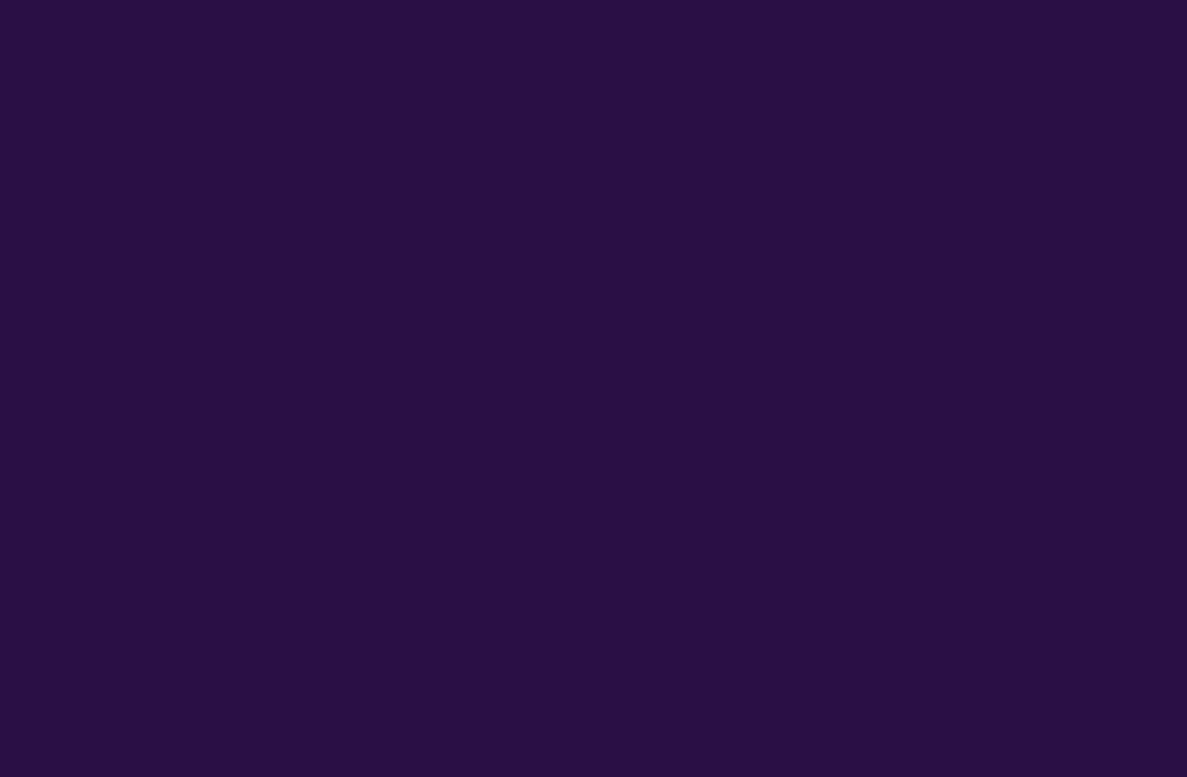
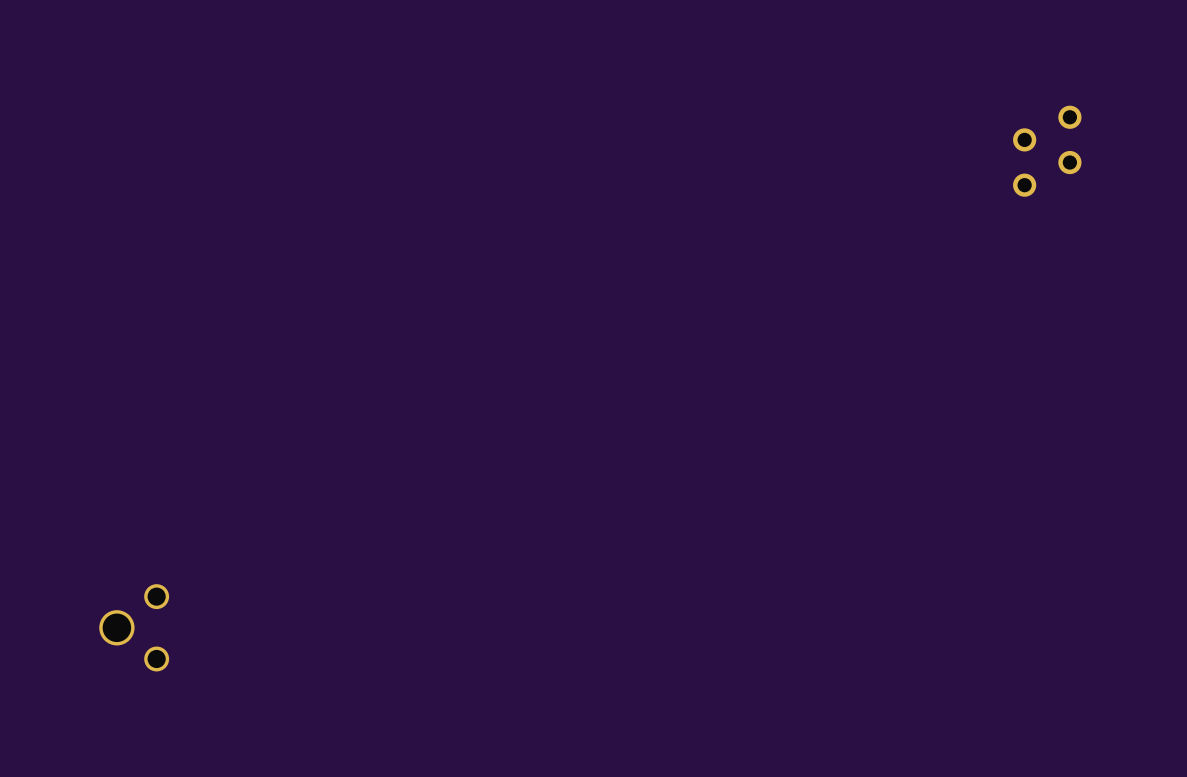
part: none -> (1047, 151)
part: none -> (134, 627)

